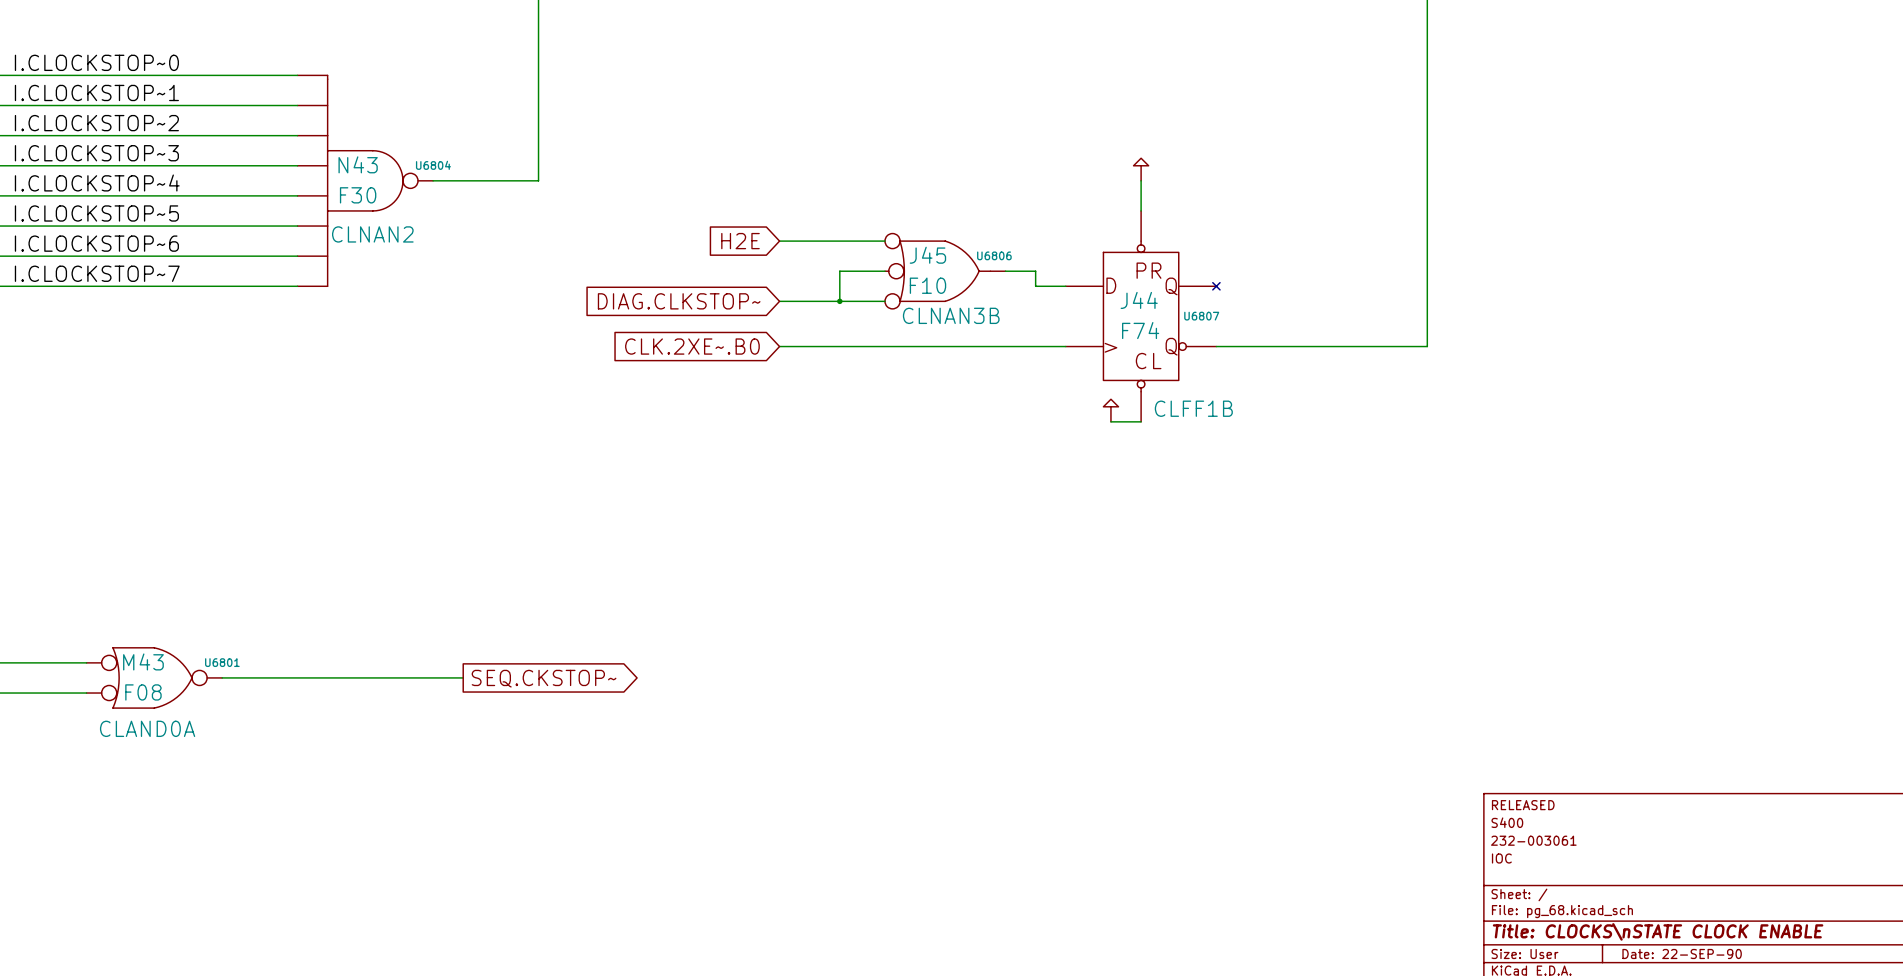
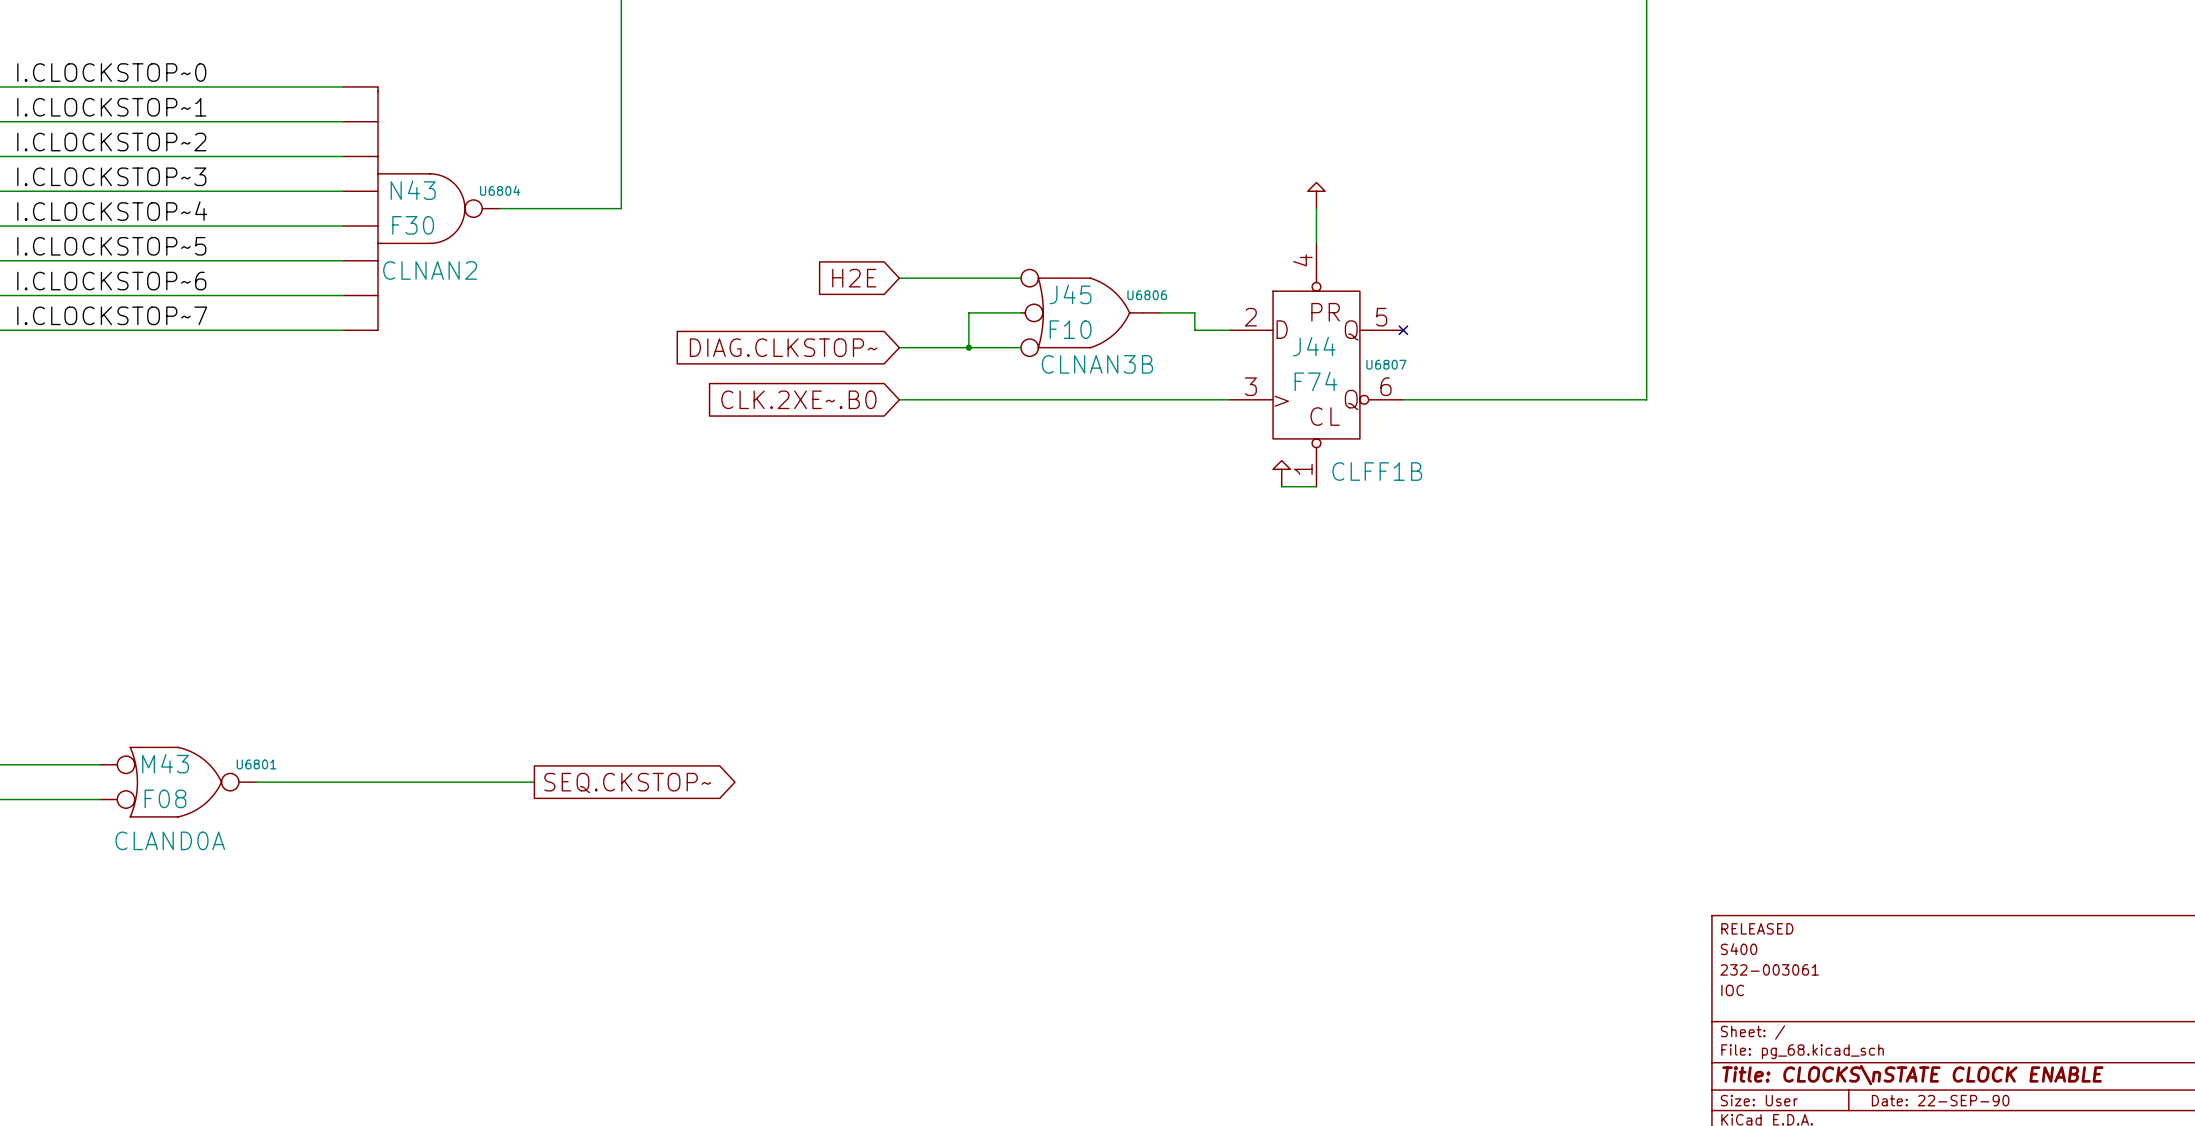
U6807 pin number: none -> 4 (1302, 260)
U6807 pin number: none -> 2 (1250, 317)
U6807 pin number: none -> 5 (1381, 317)
U6807 pin number: none -> 3 (1250, 386)
U6807 pin number: none -> 6 (1385, 386)
U6807 pin number: none -> 1 (1303, 469)

